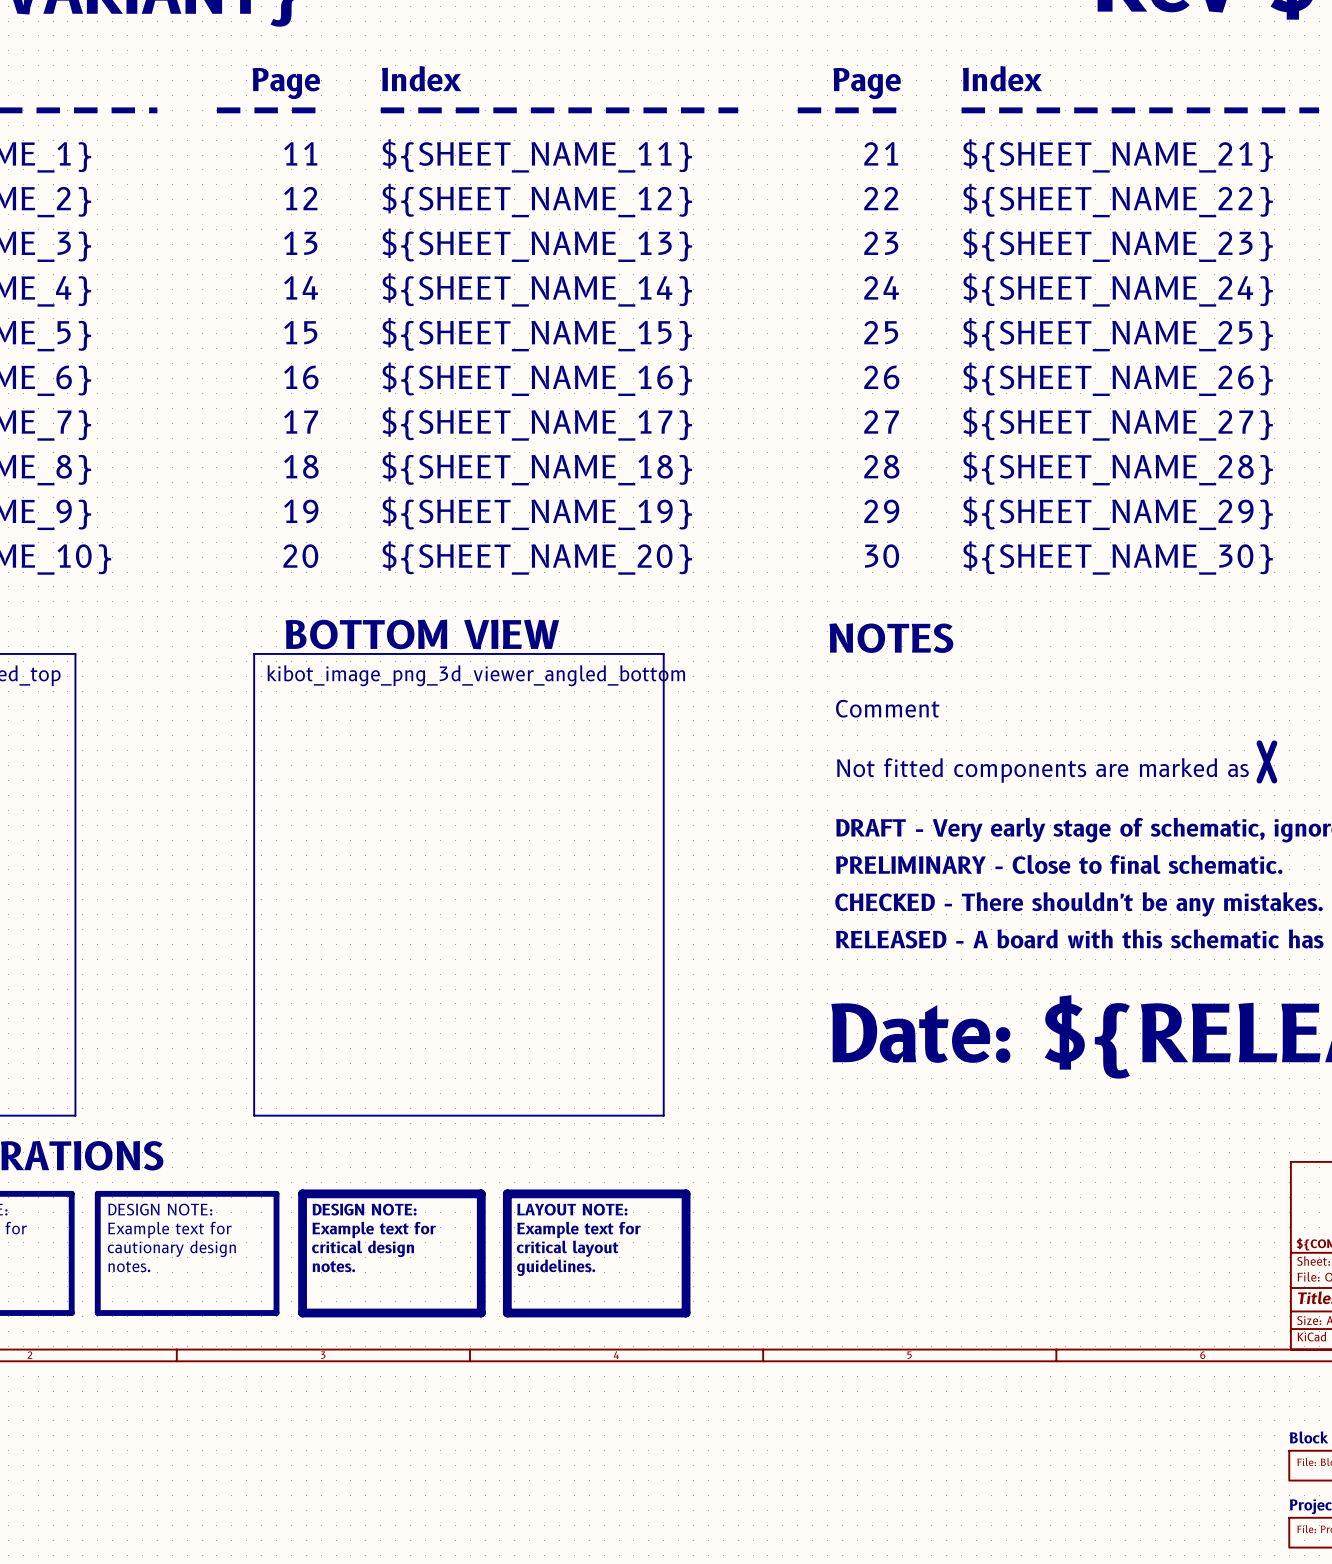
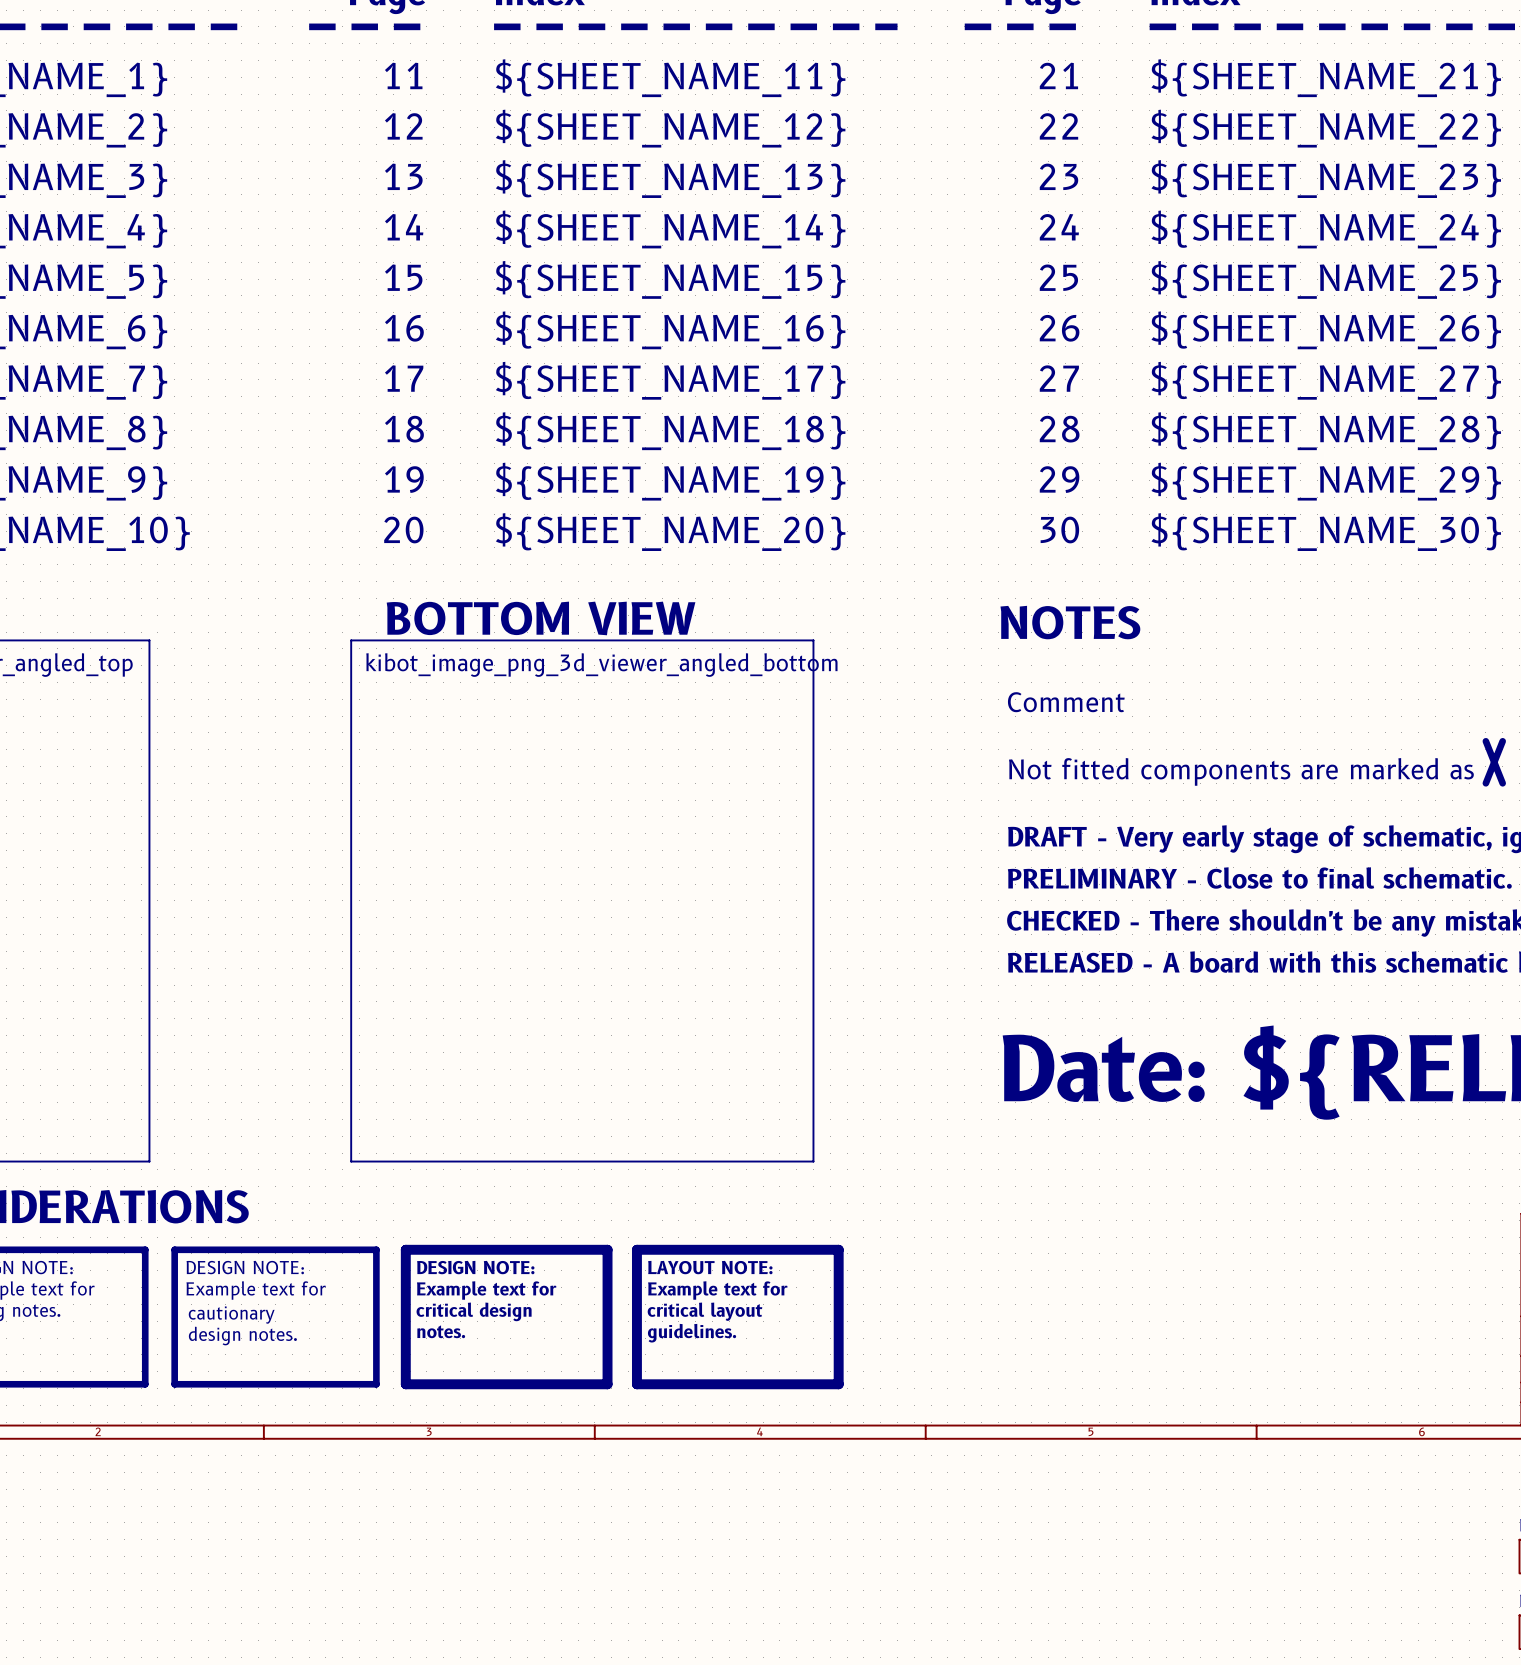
text: cautionary design (171, 1248) -> cautionary (231, 1315)
text: notes. (129, 1266) -> design notes. (242, 1336)

